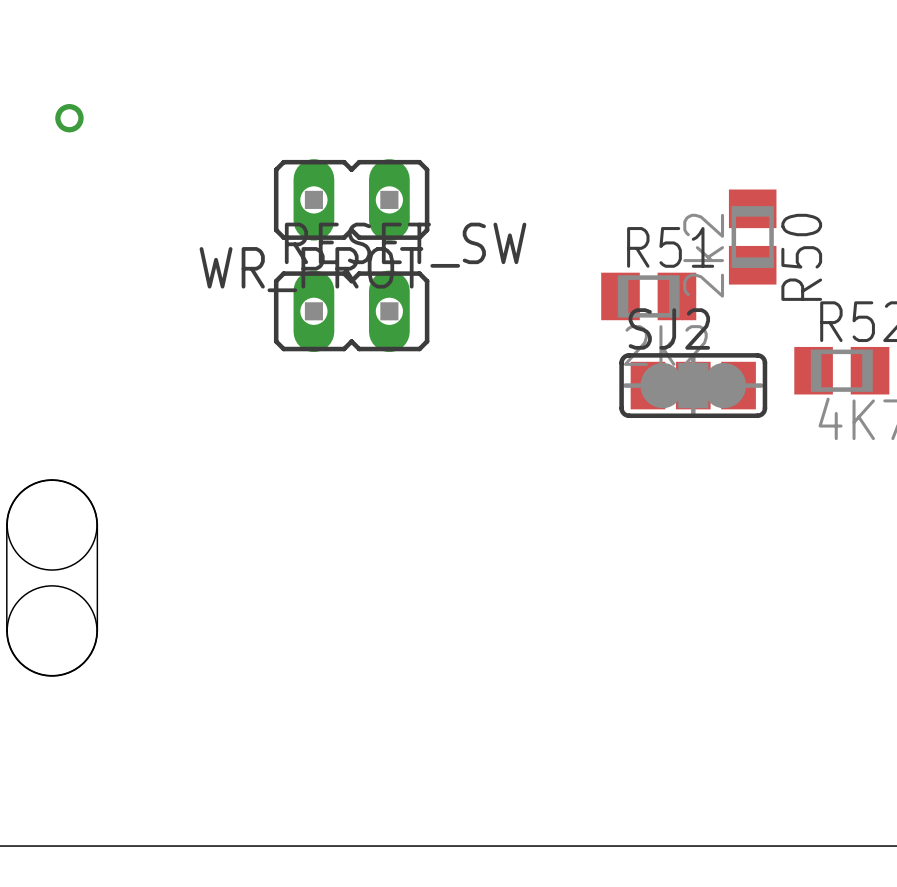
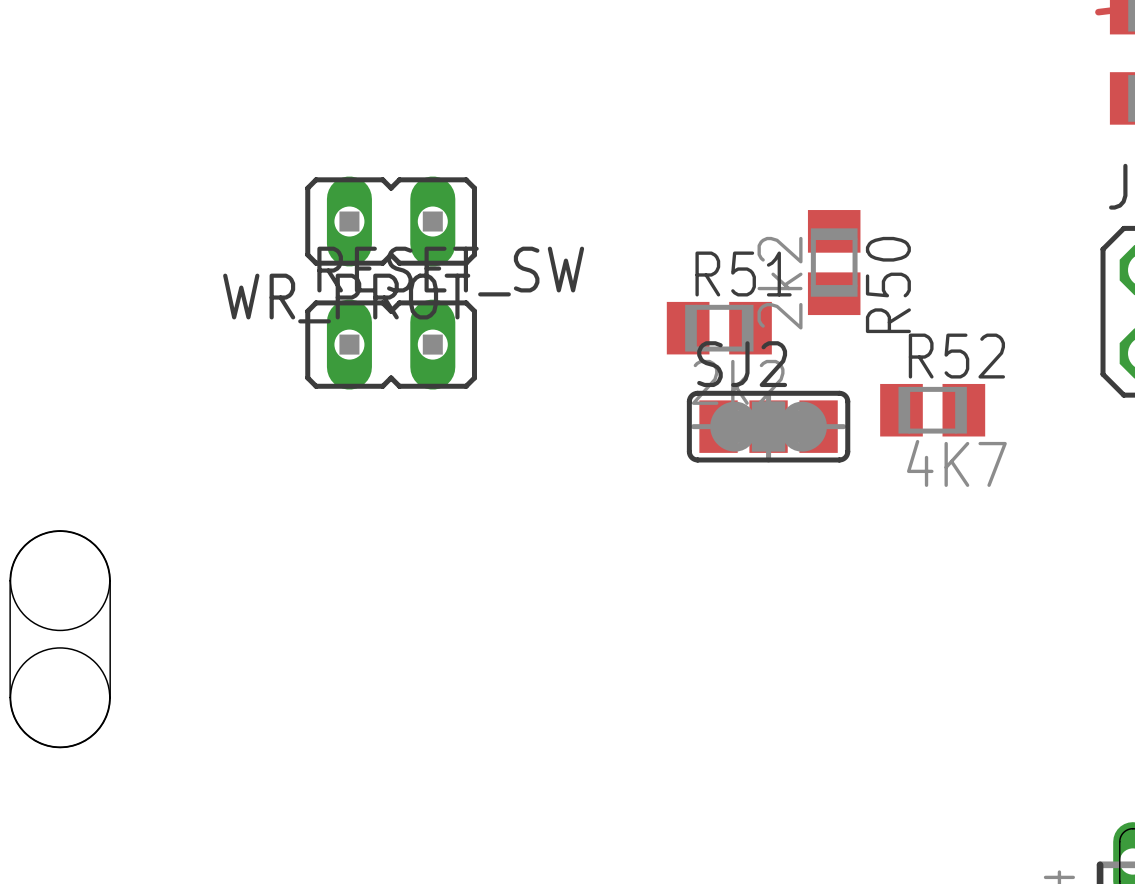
via: (69, 118) -> none

